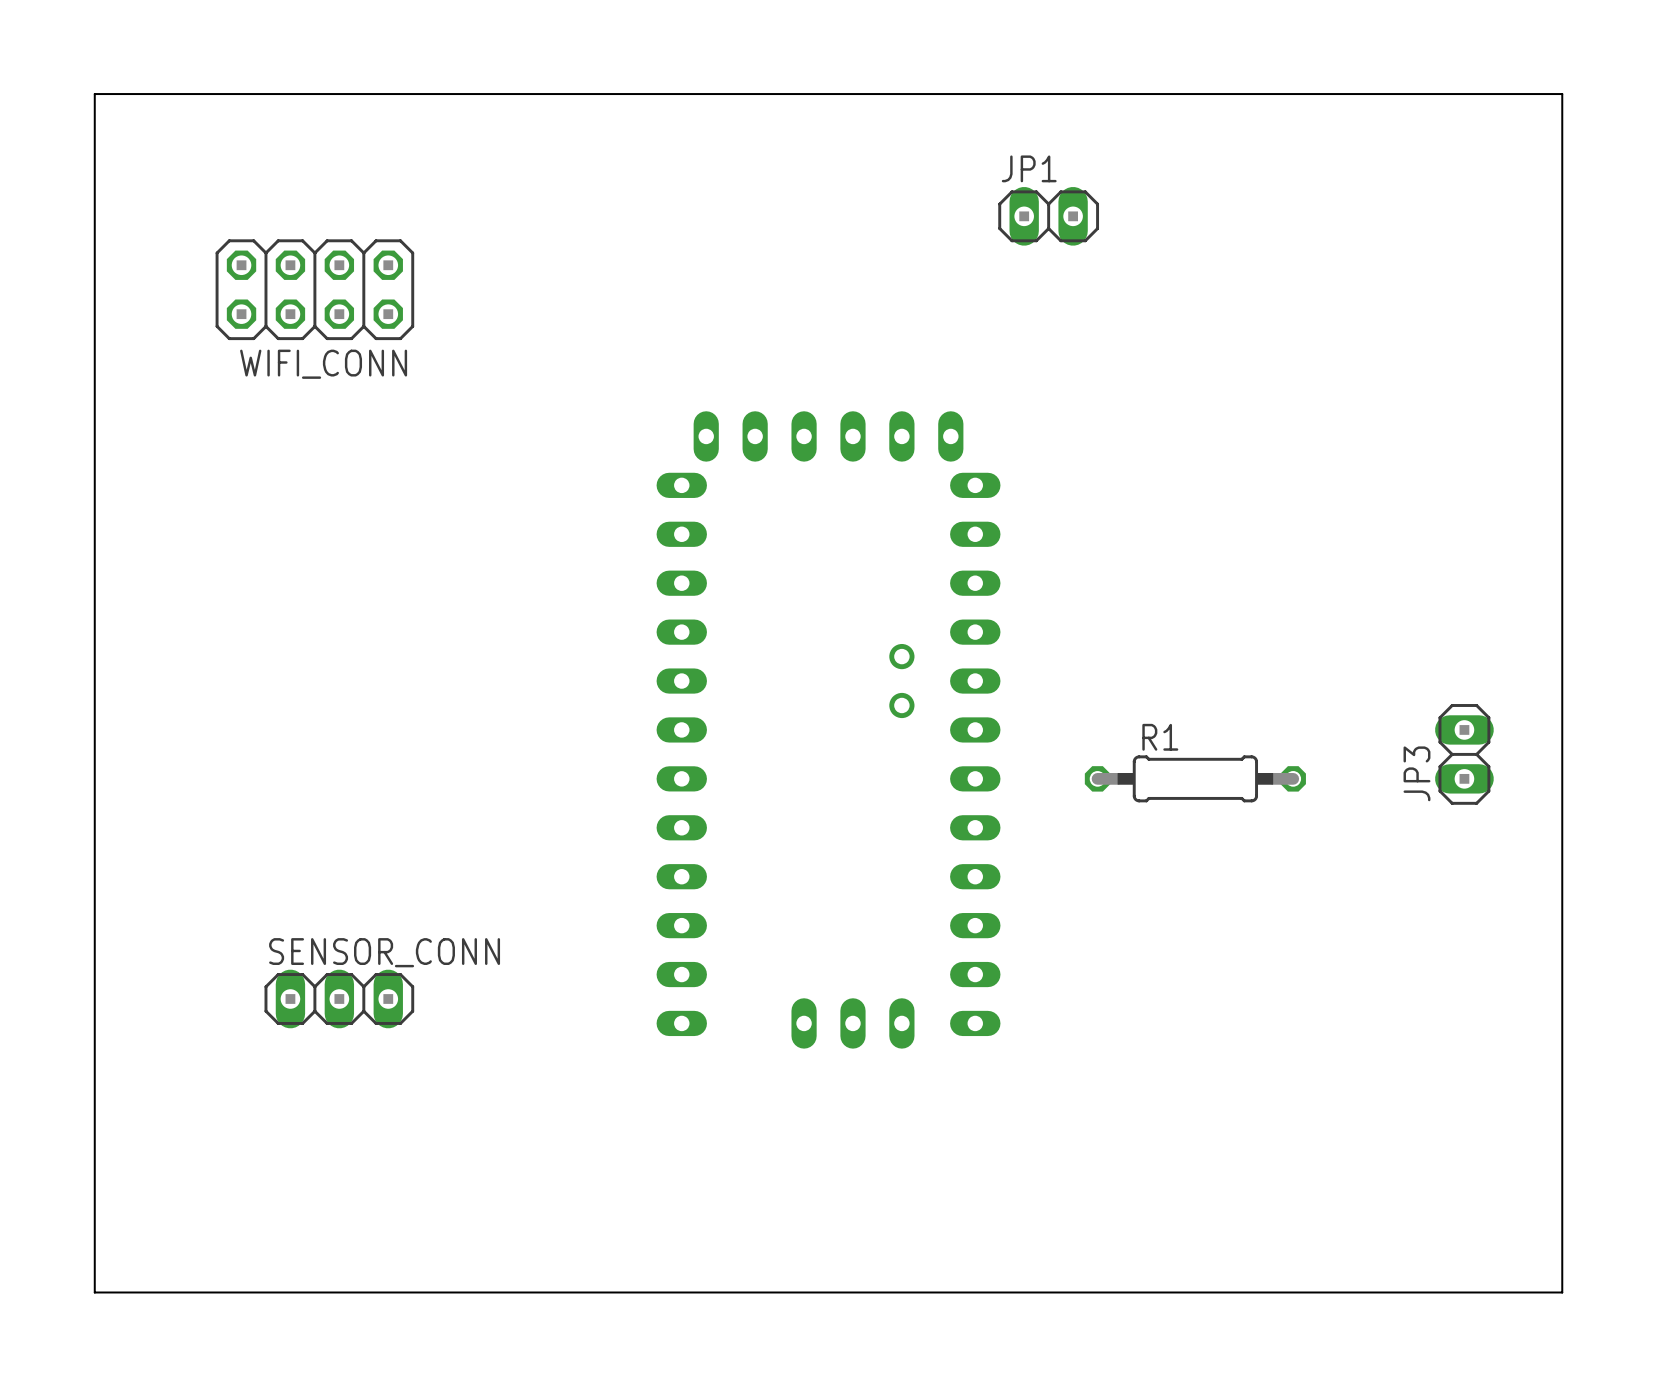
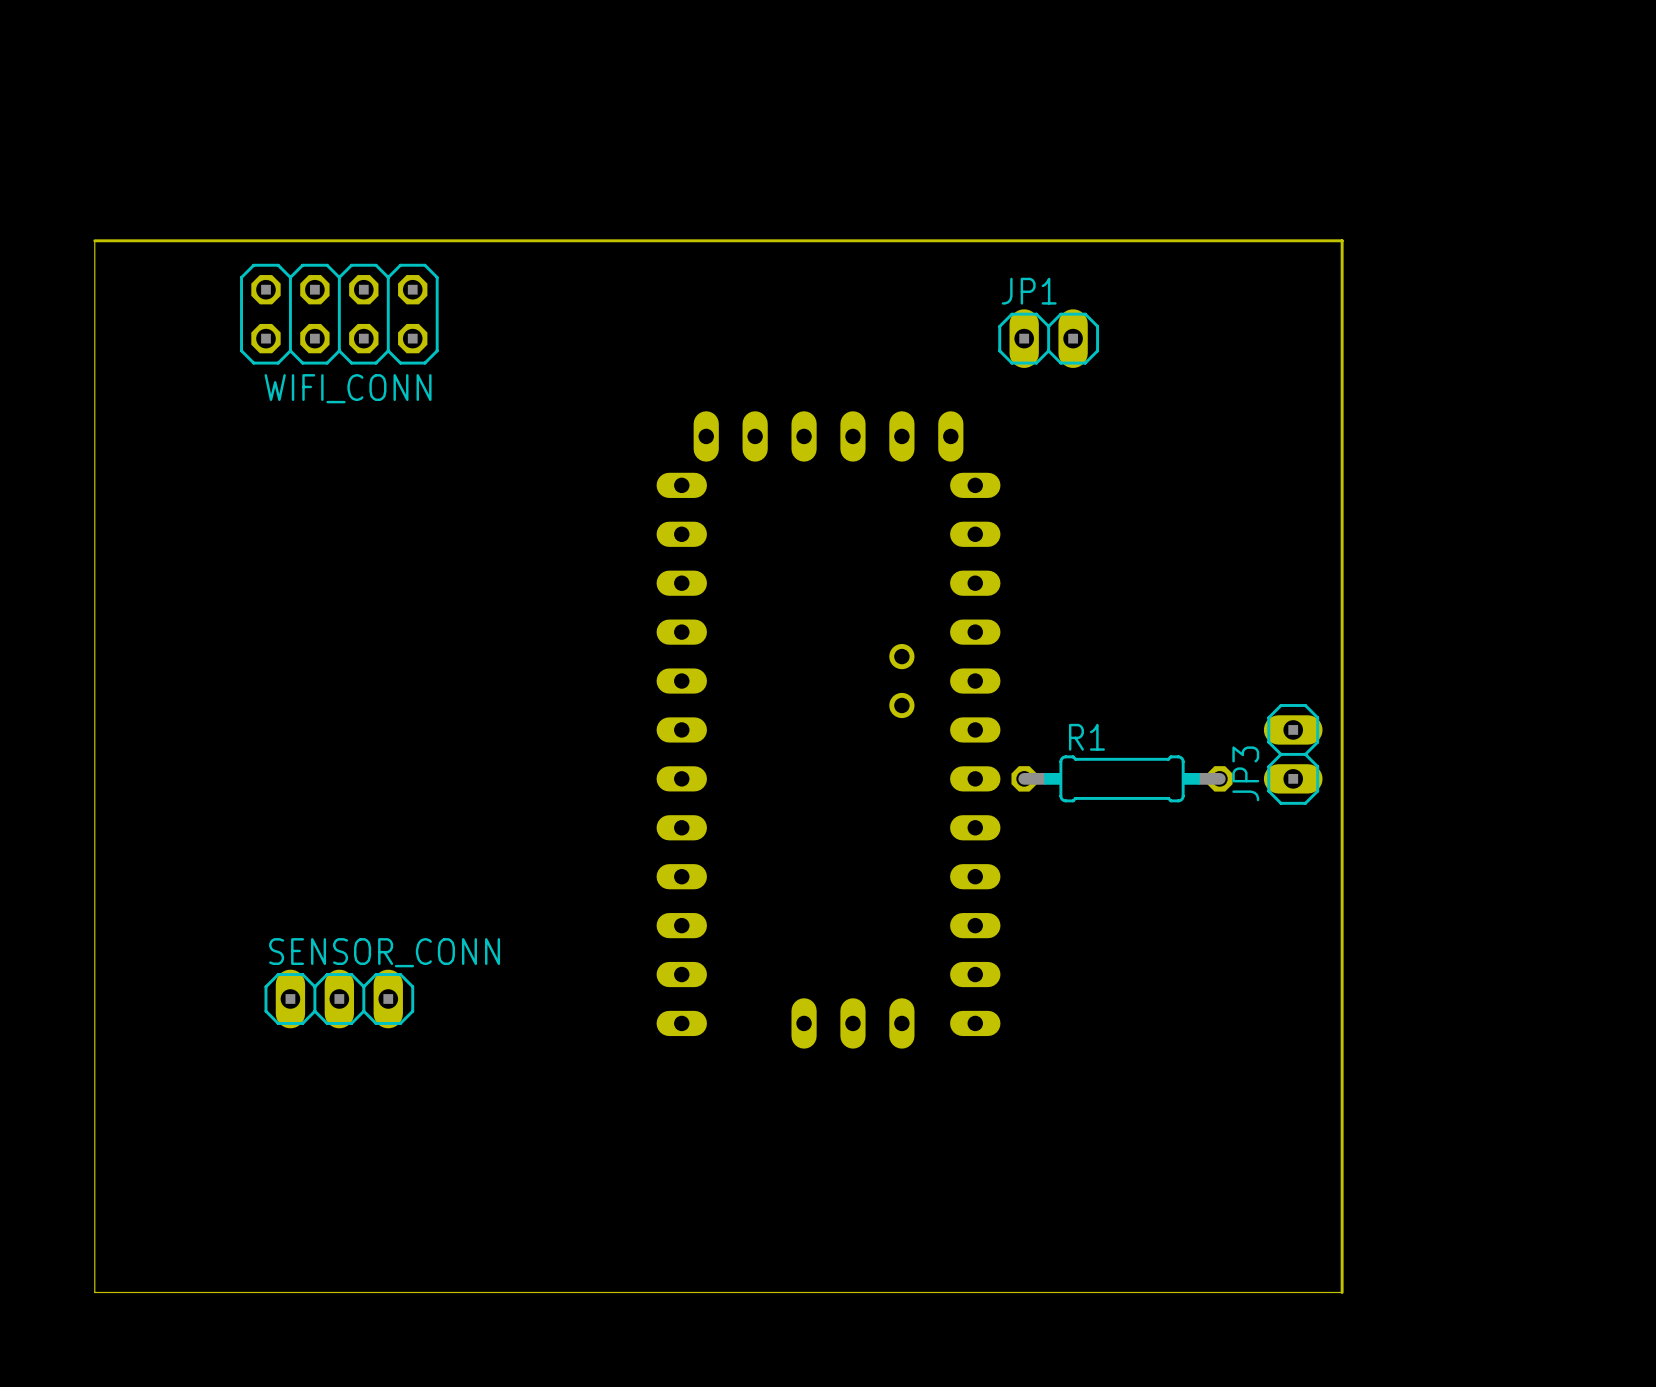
JP1 position: (1048, 216) -> (1048, 338)
board edge: (94, 240) (94, 94) (1562, 94) (1562, 1292) (1342, 1292) -> (94, 240) (1342, 240) (1342, 1292)
WIFI_CONN position: (314, 289) -> (339, 314)
JP3 position: (1464, 754) -> (1293, 754)
R1 position: (1195, 778) -> (1122, 778)

